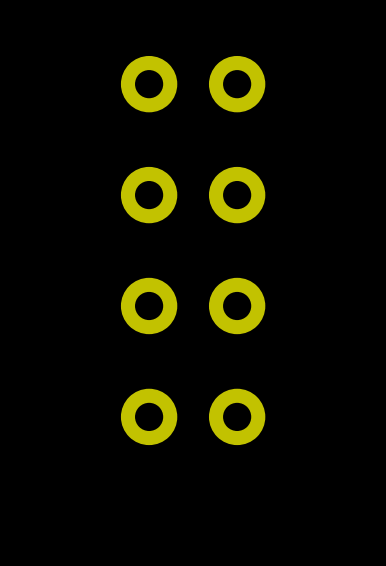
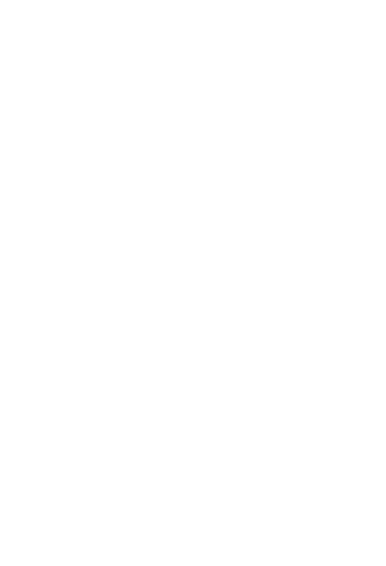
part: (193, 84) -> none
part: (193, 195) -> none
part: (193, 305) -> none
part: (193, 416) -> none

